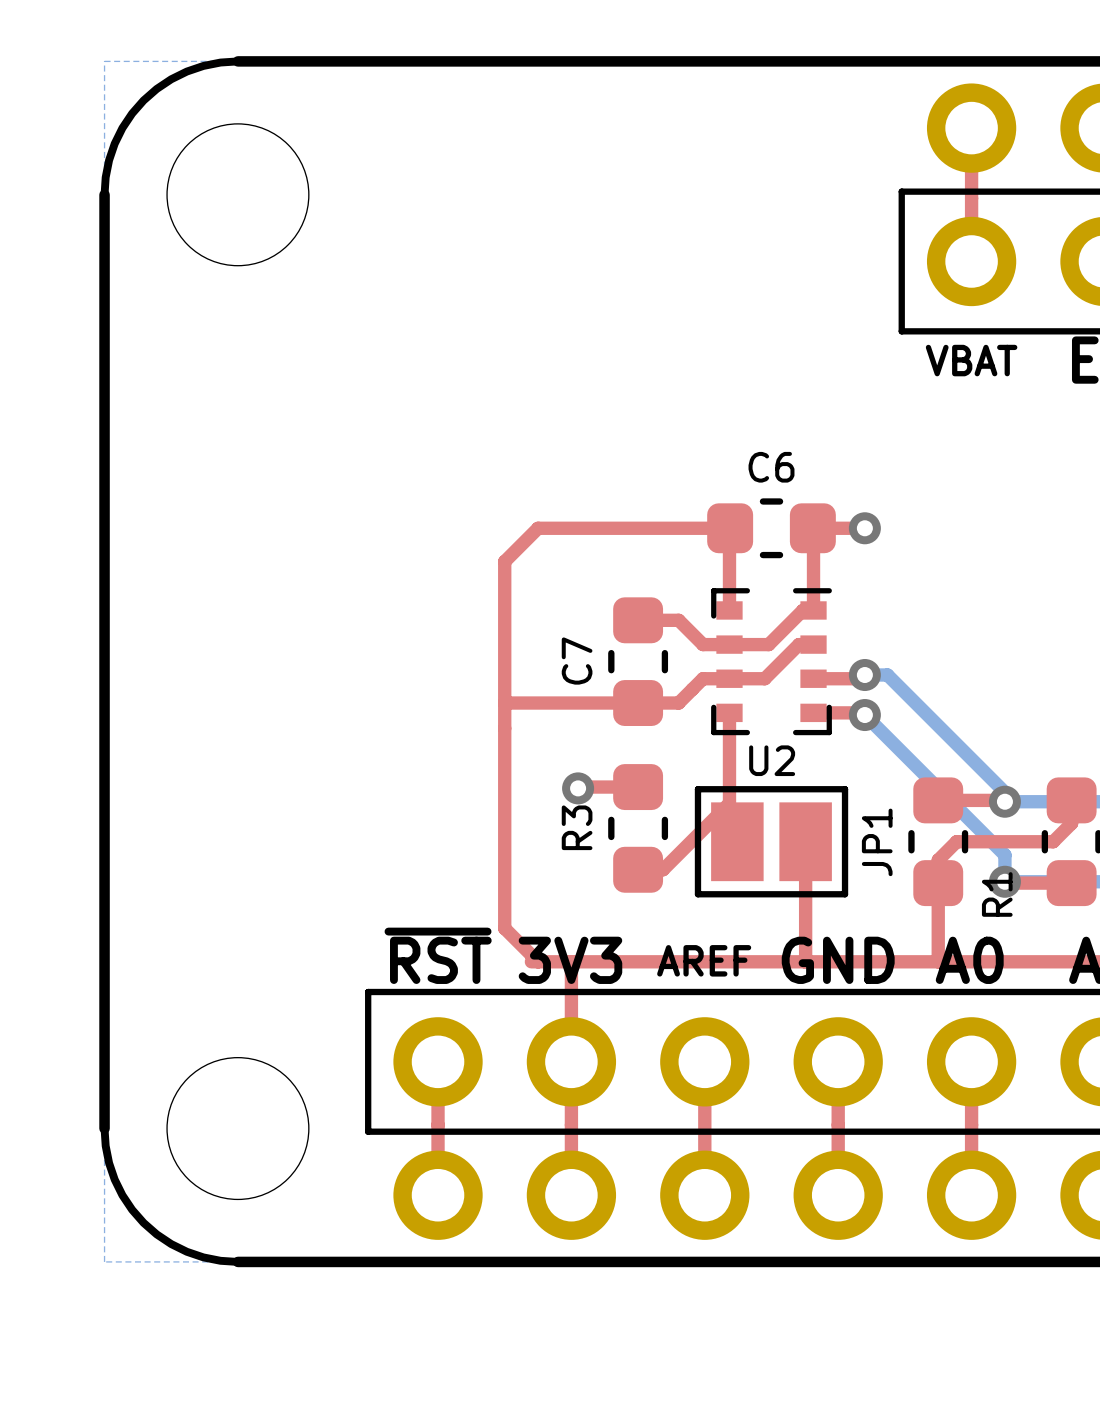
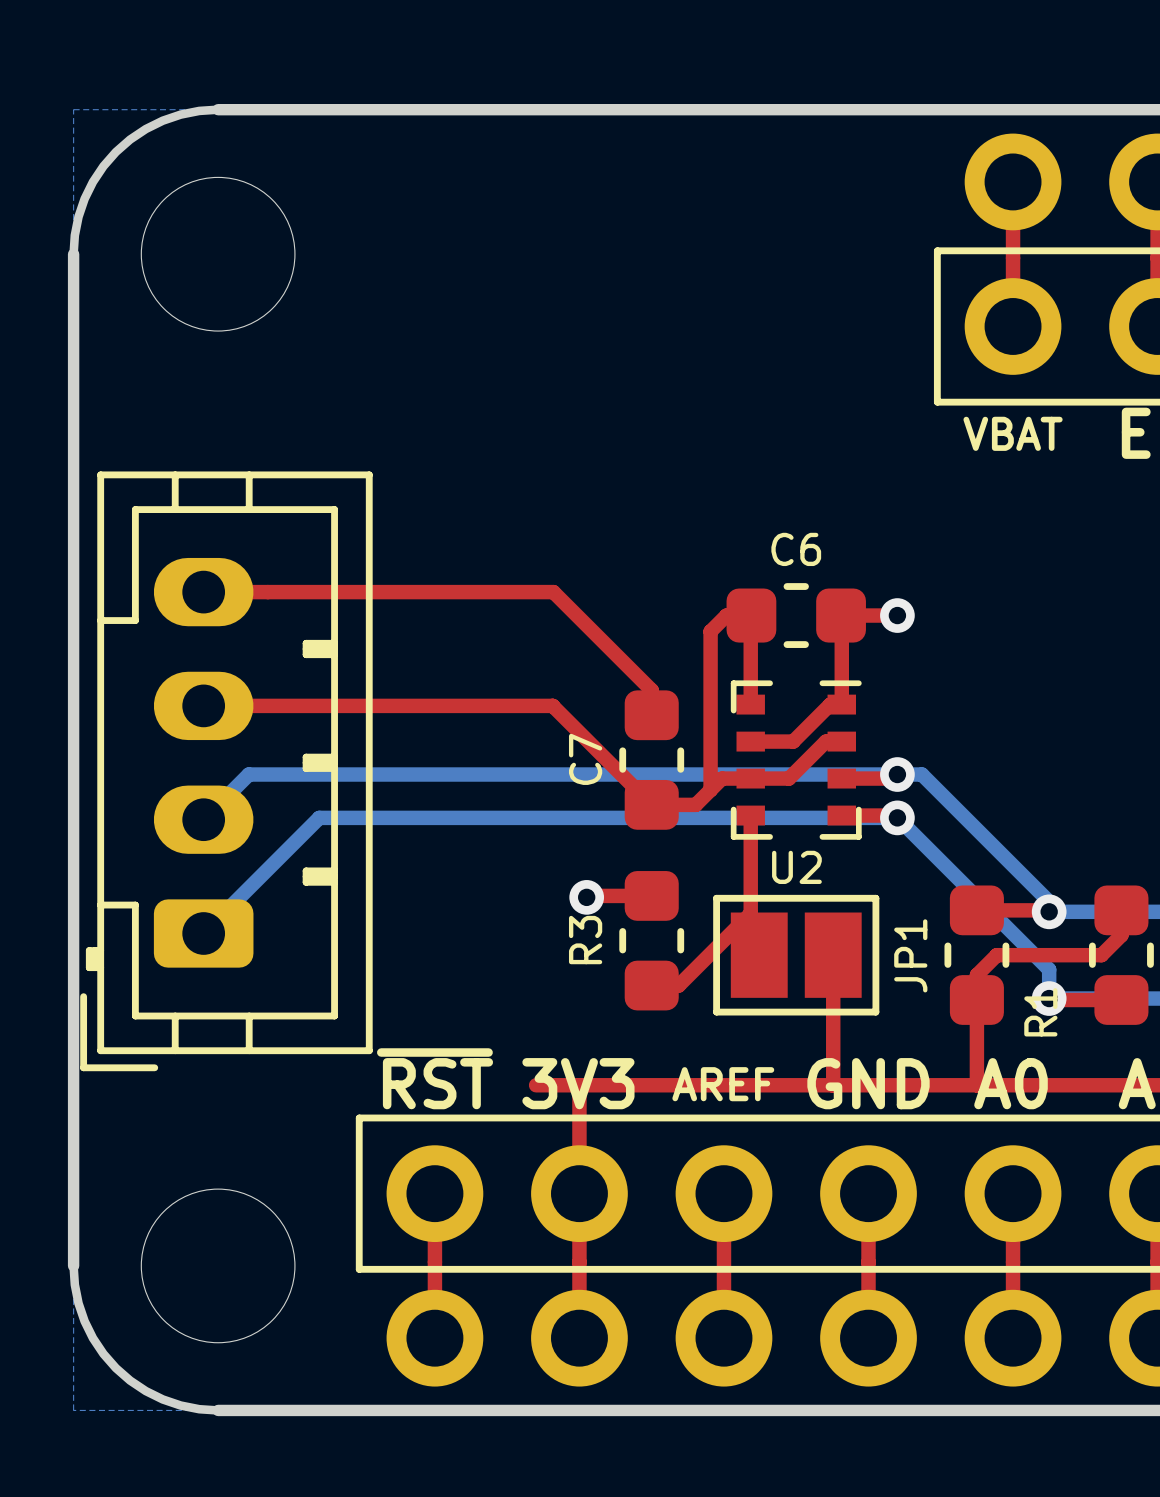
top track: (707, 528) (538, 528) (504, 561) (504, 928) (538, 961) -> (726, 615) (710, 631) (710, 790)
top track: (638, 620) (678, 620) (703, 644) (729, 644) -> (651, 715) (651, 690) (553, 592) (203, 592)
part: none -> (226, 771)
bottom track: none -> (897, 774) (248, 774) (203, 819)
top track: (504, 703) (638, 703) -> (203, 705) (552, 705) (651, 804)
bottom track: none -> (897, 817) (319, 817) (203, 933)

